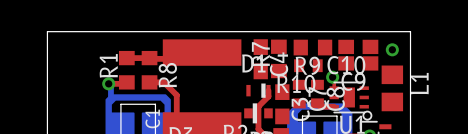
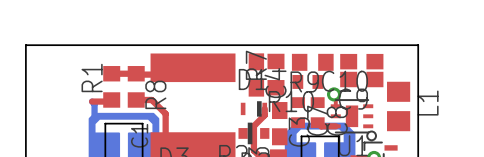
via: (392, 49) -> none
via: (108, 83) -> none

